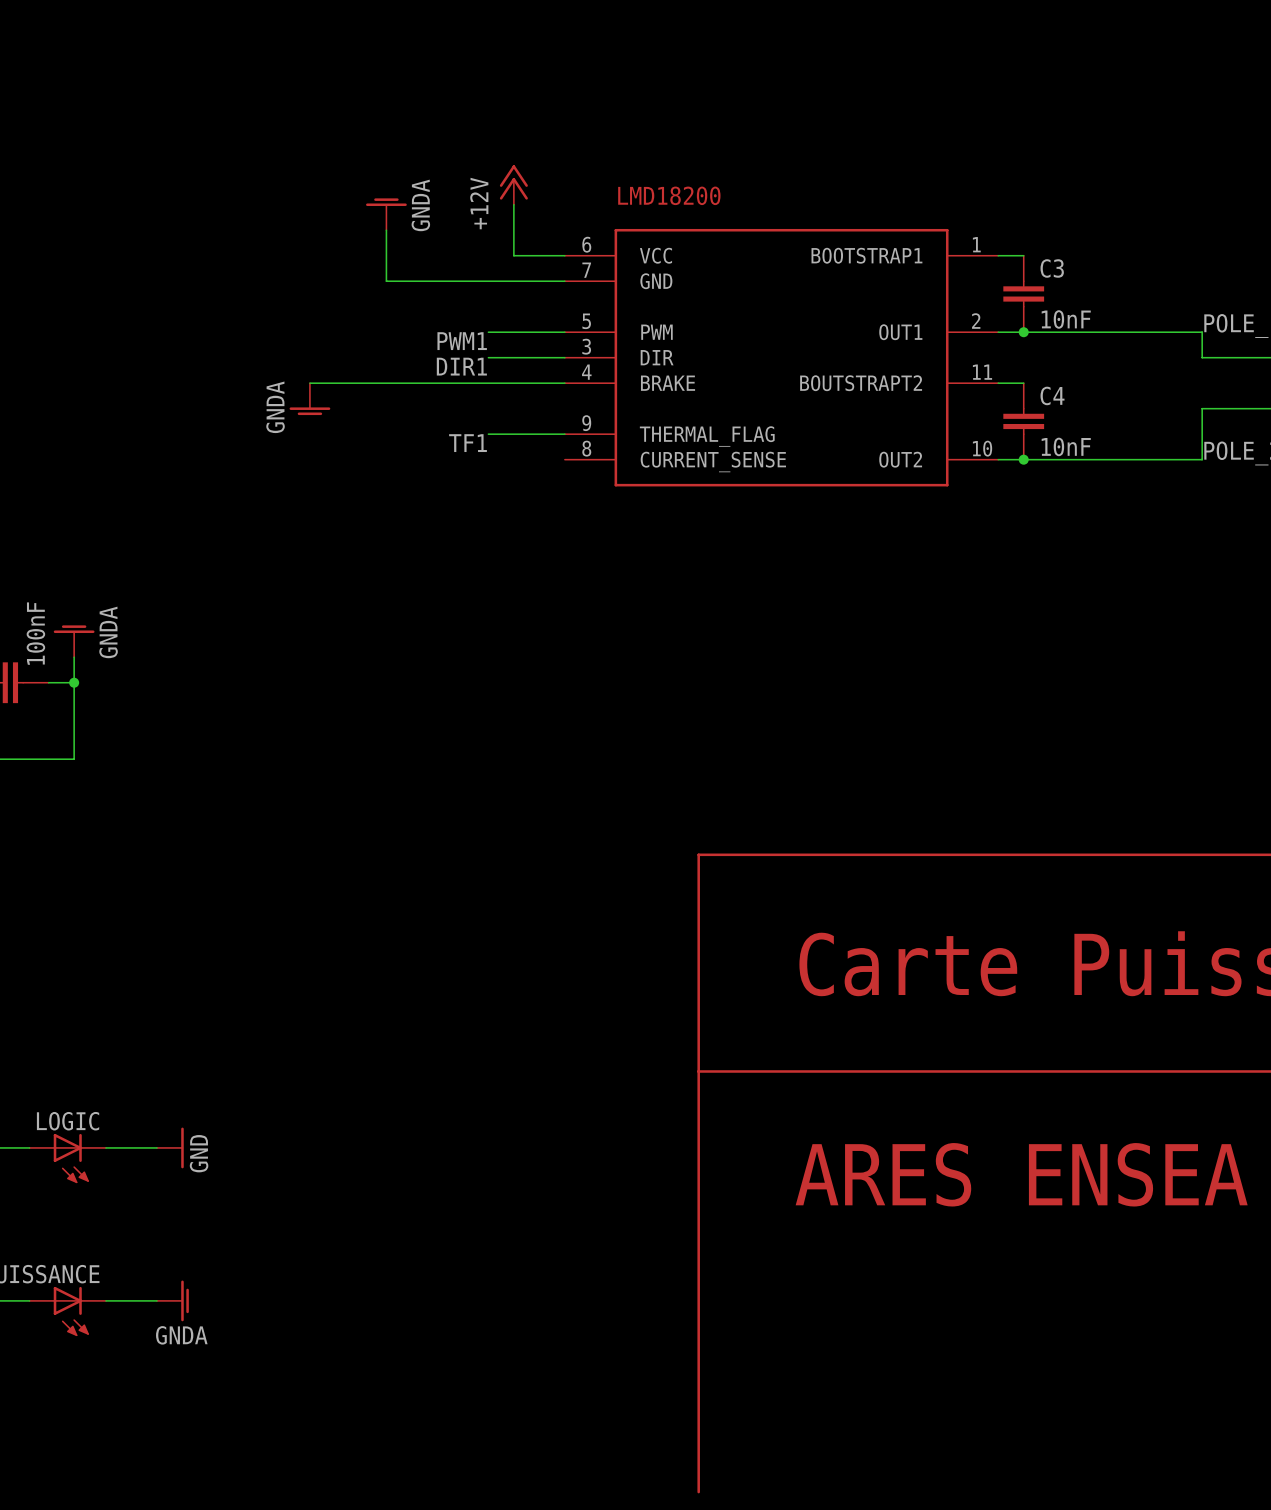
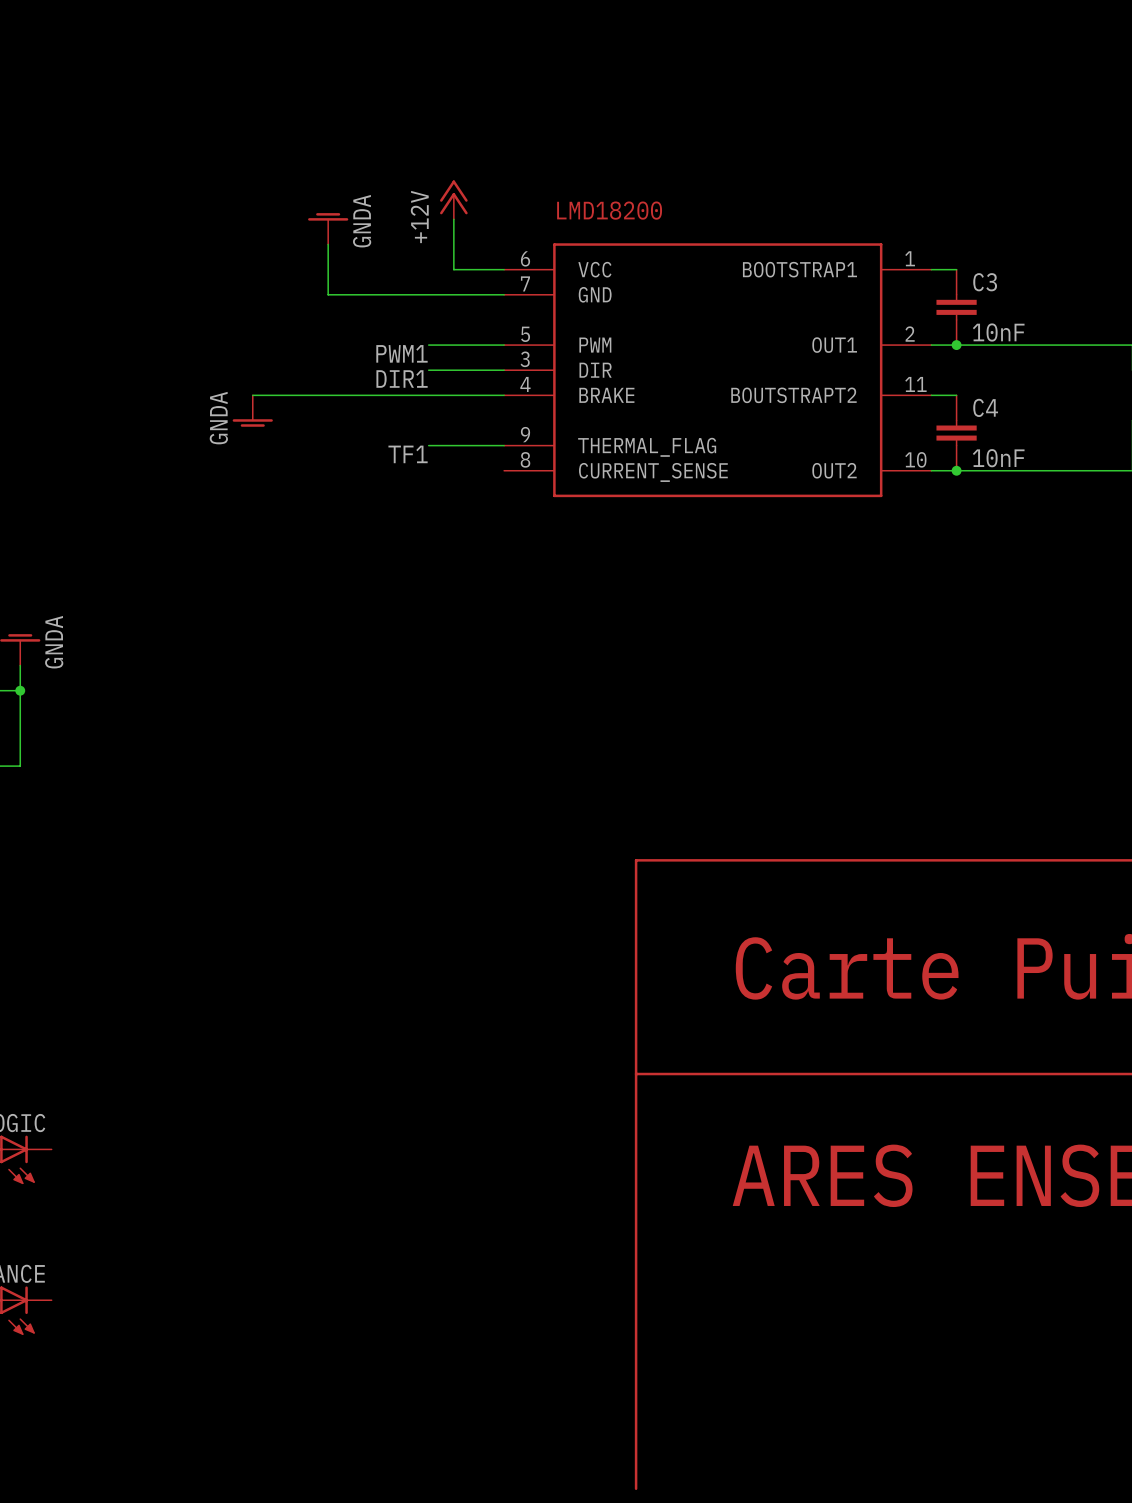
wire: (106, 1147) (156, 1147) -> none
power symbol: GND (170, 1147) -> none
wire: (106, 1300) (156, 1300) -> none
power symbol: GNDA (172, 1300) -> none

